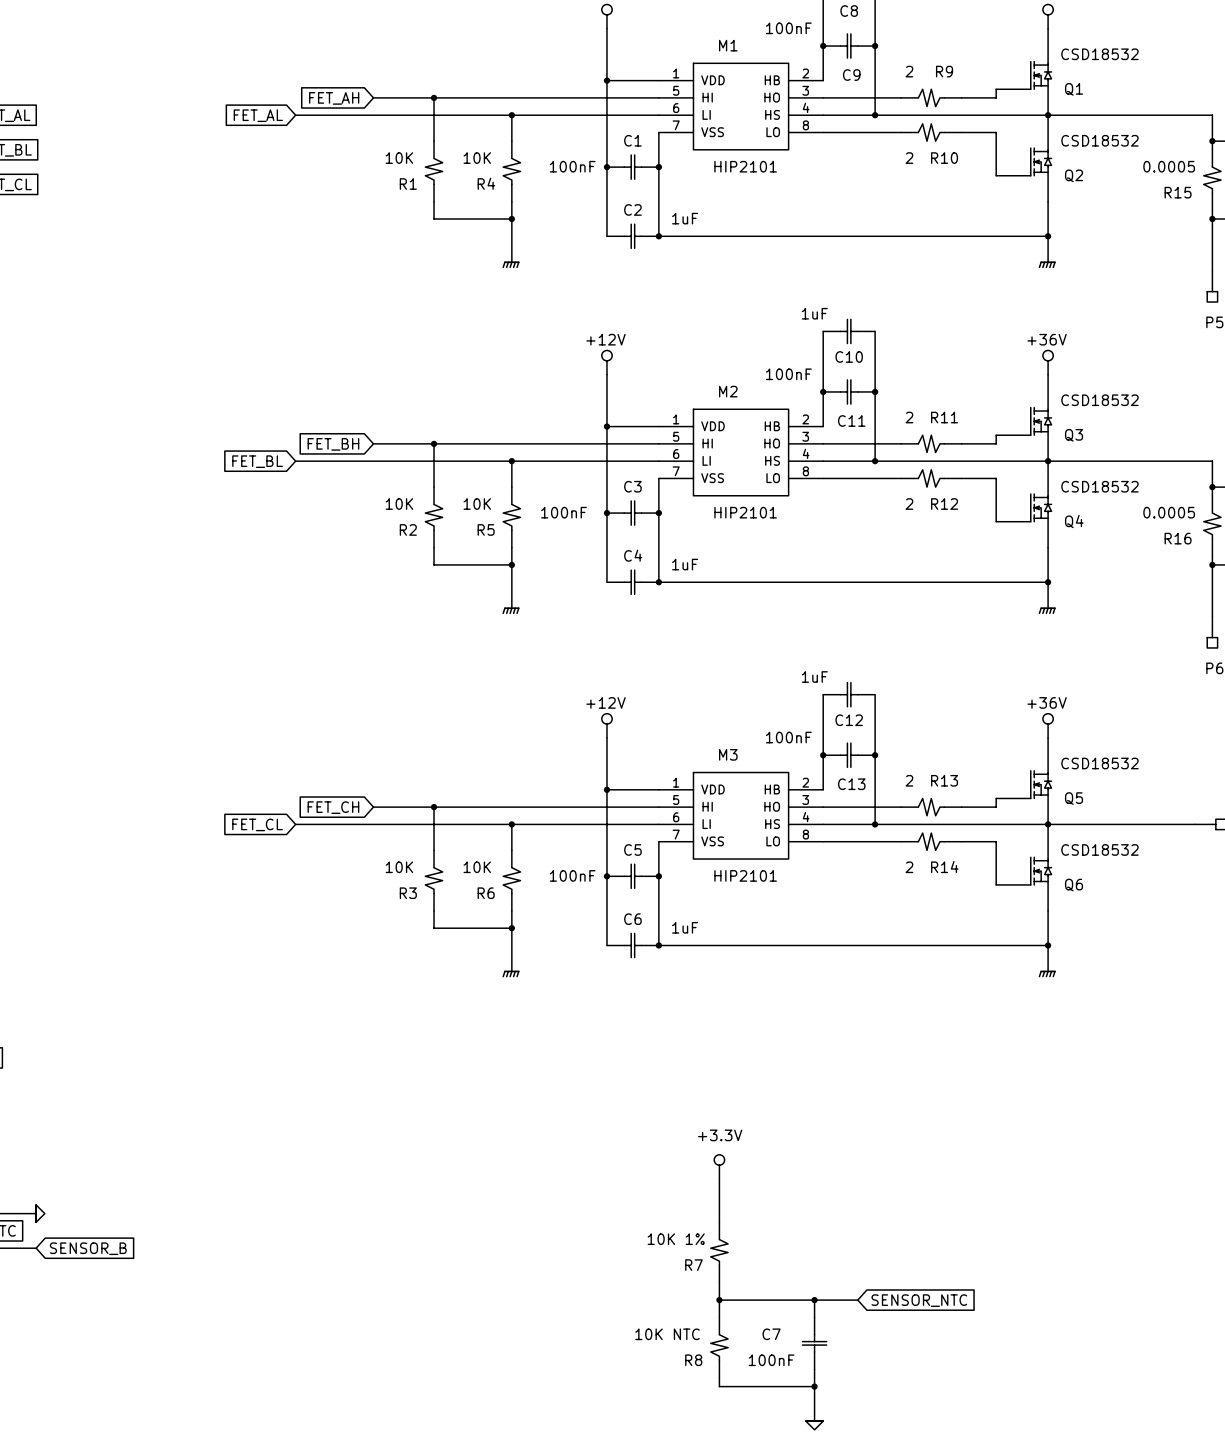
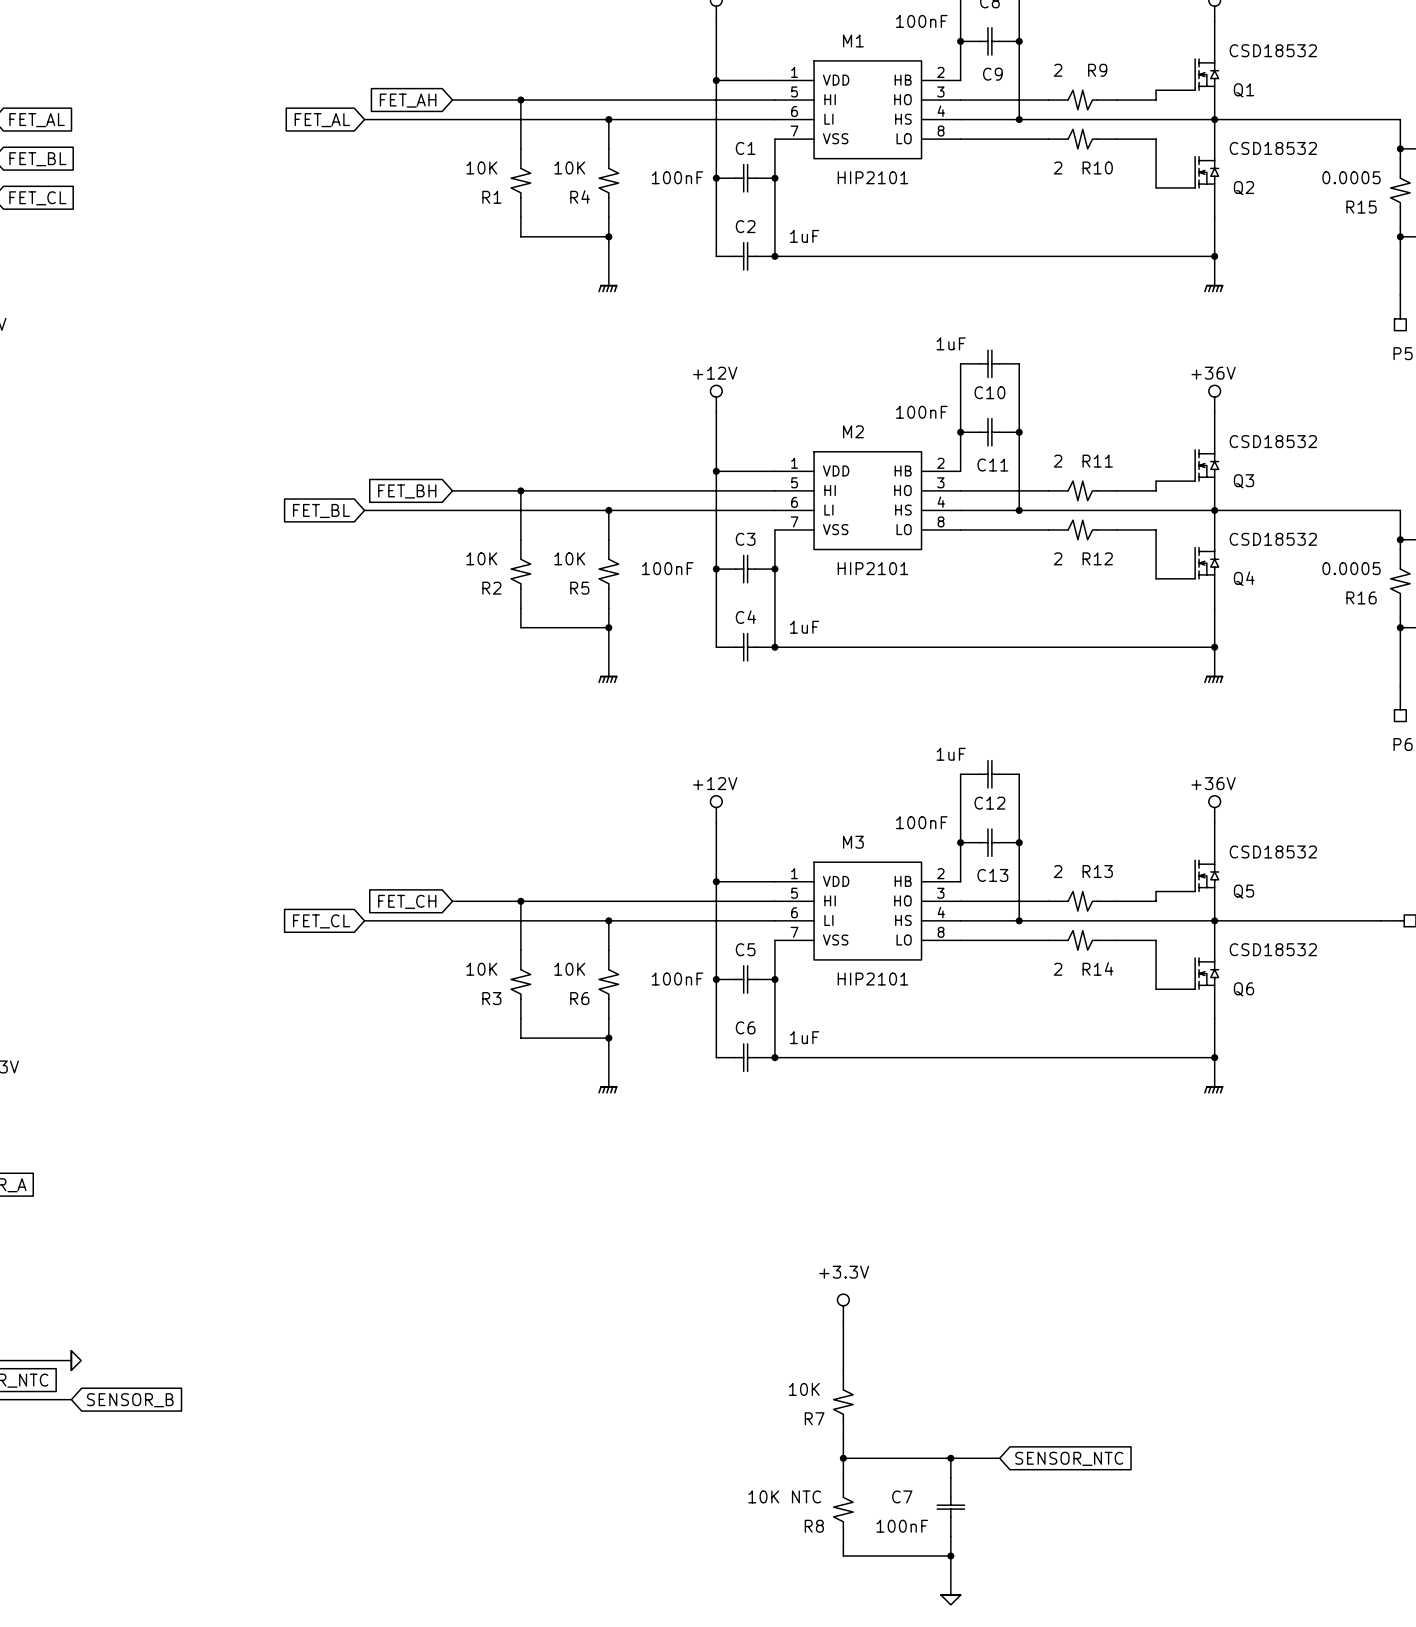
R7 value: 10K 1% (676, 1239) -> 10K (804, 1389)

